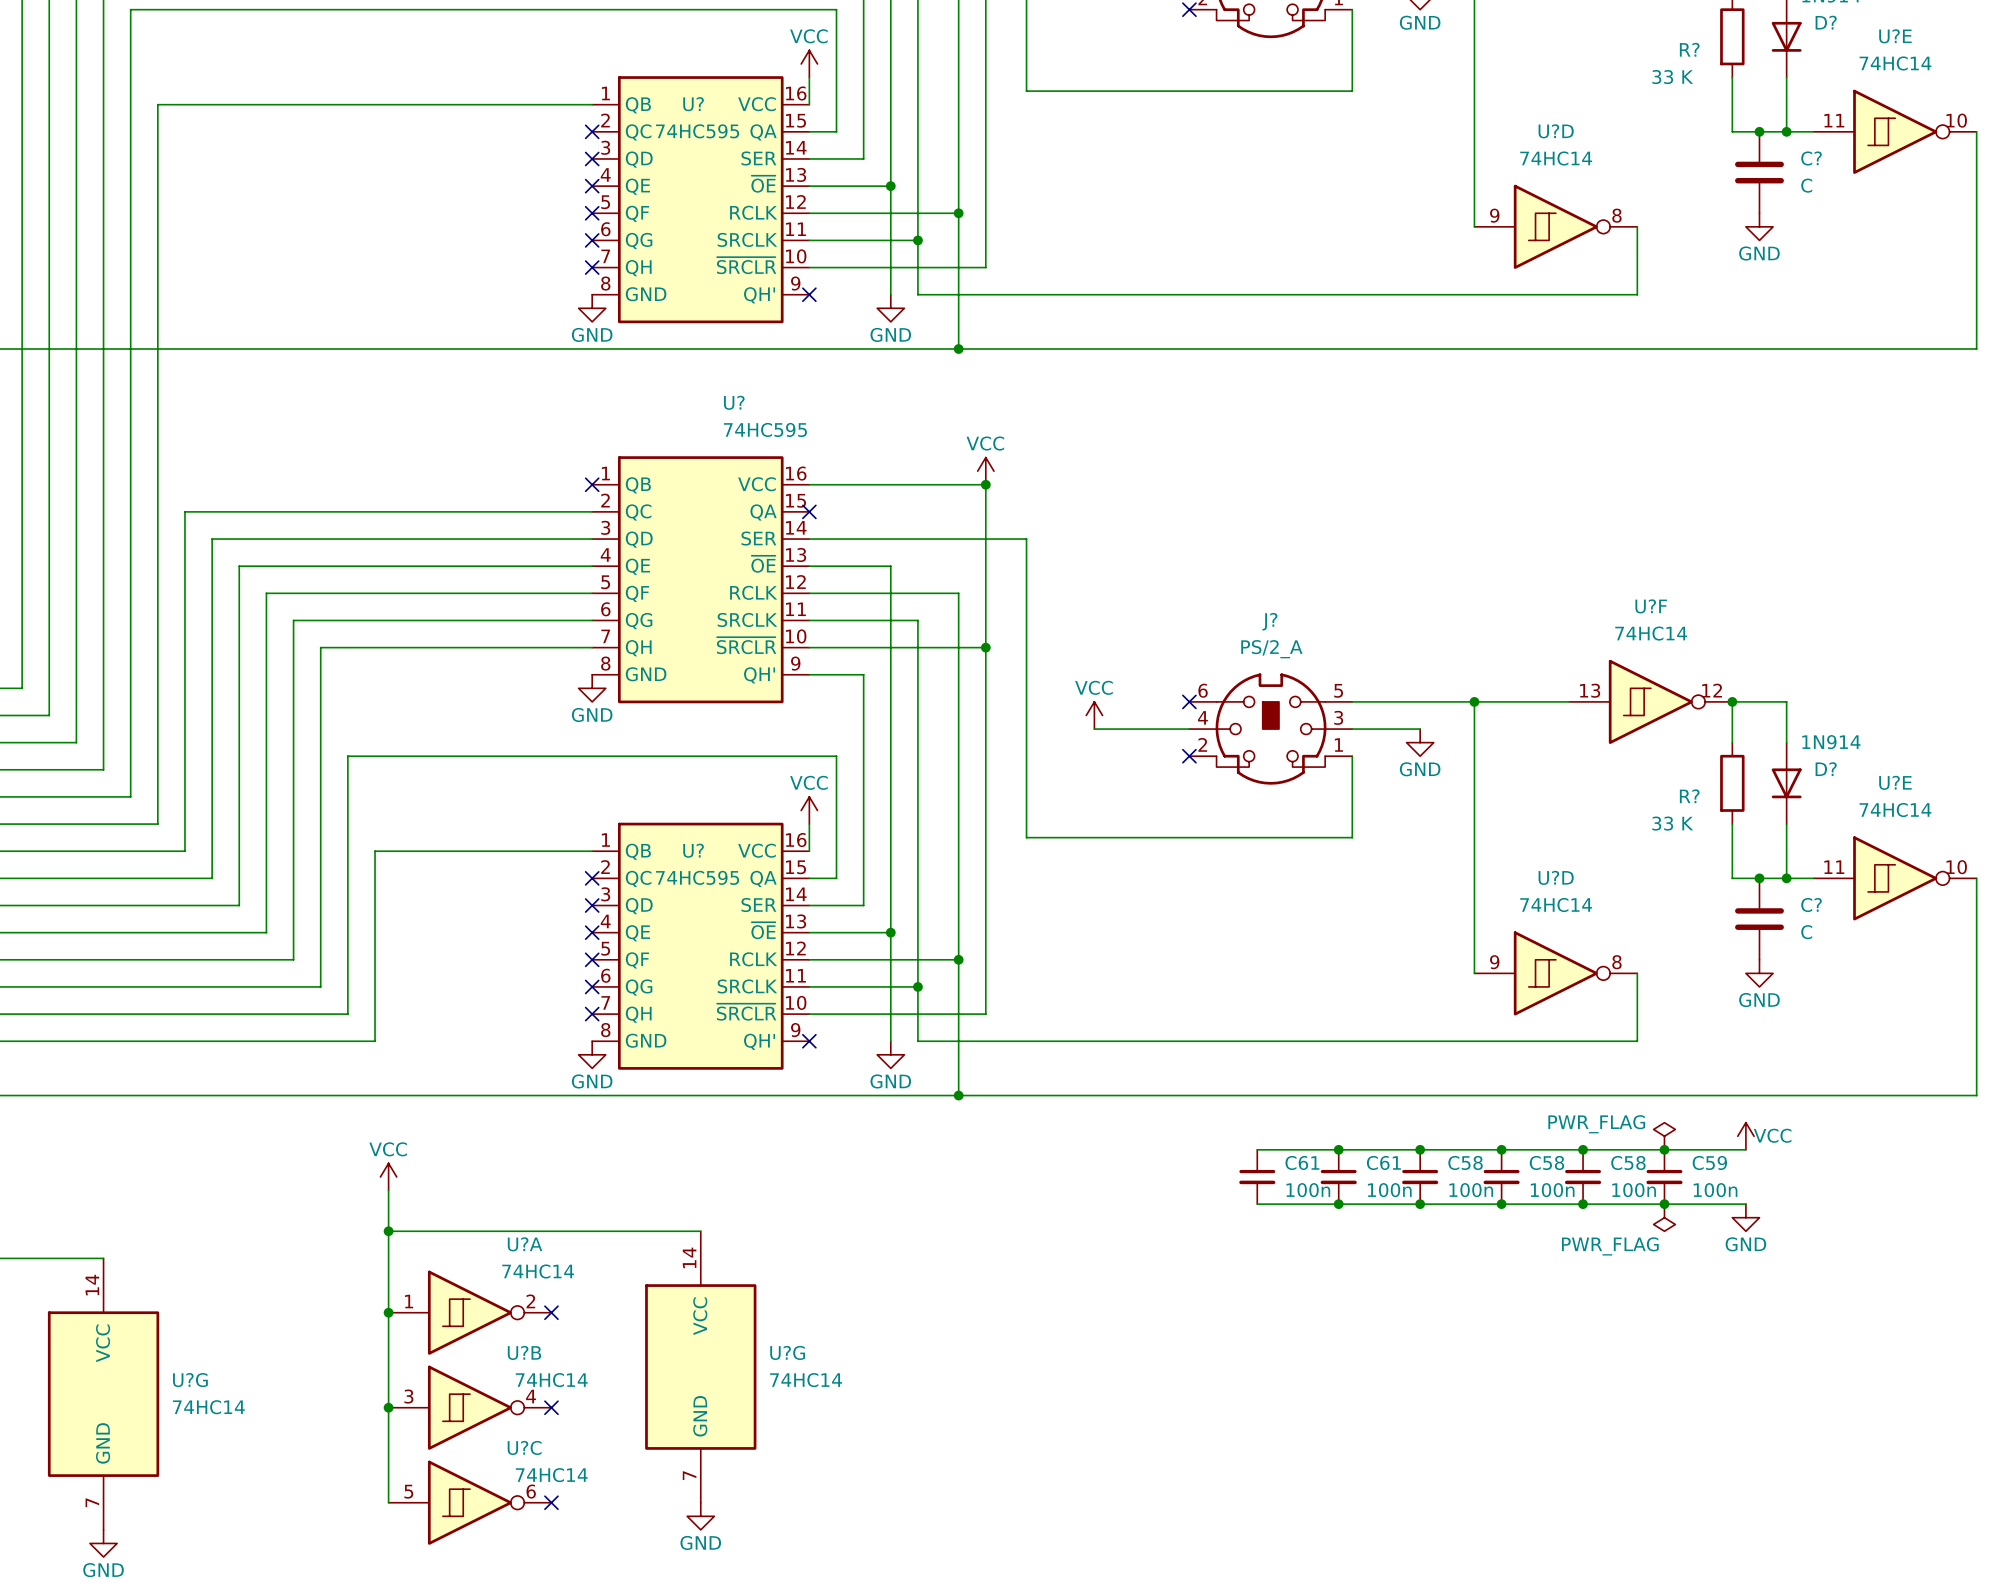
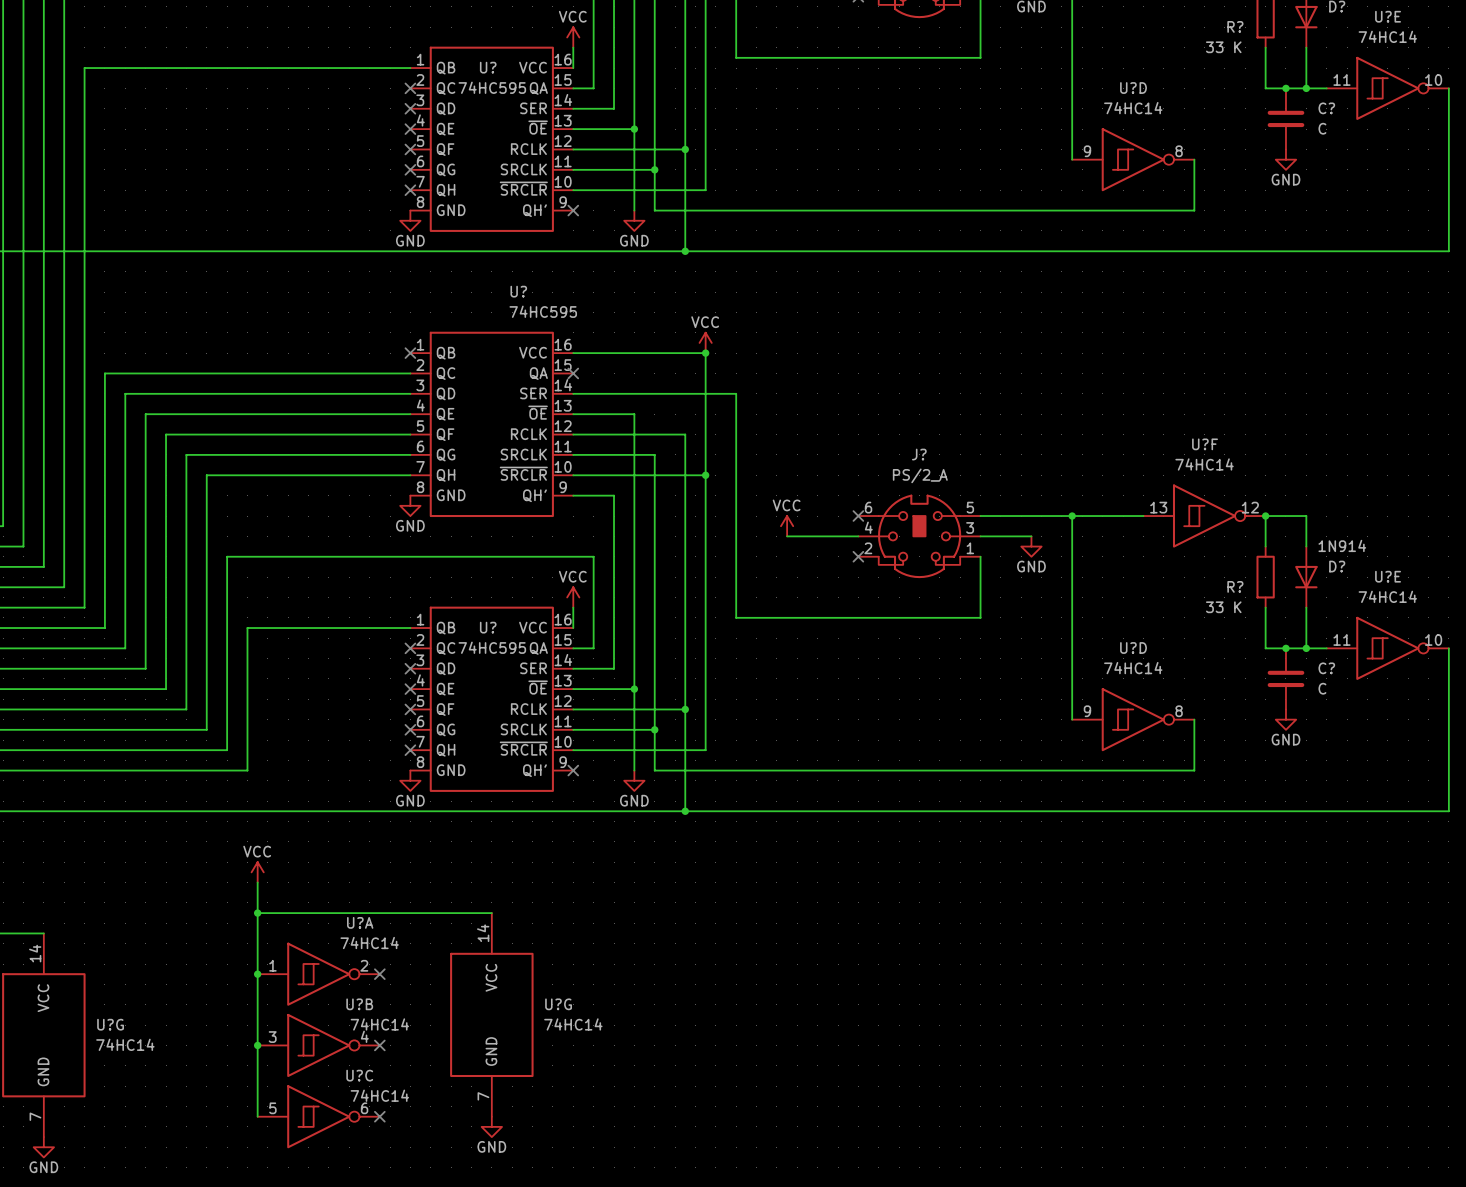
power symbol: PWR_FLAG (1664, 1136) -> none
power symbol: VCC (1745, 1136) -> none
wire: (1257, 1149) (1745, 1149) -> none
junction: (1338, 1149) -> none
junction: (1420, 1149) -> none
junction: (1501, 1149) -> none
junction: (1583, 1149) -> none
junction: (1664, 1149) -> none
C61: 100n (1257, 1176) -> none
C61: 100n (1338, 1176) -> none
C58: 100n (1420, 1176) -> none
C58: 100n (1501, 1176) -> none
C58: 100n (1583, 1176) -> none
C59: 100n (1664, 1176) -> none
wire: (1257, 1204) (1745, 1204) -> none
junction: (1338, 1204) -> none
junction: (1420, 1204) -> none
junction: (1501, 1204) -> none
junction: (1583, 1204) -> none
junction: (1664, 1204) -> none
power symbol: PWR_FLAG (1664, 1217) -> none
power symbol: GND (1745, 1217) -> none

